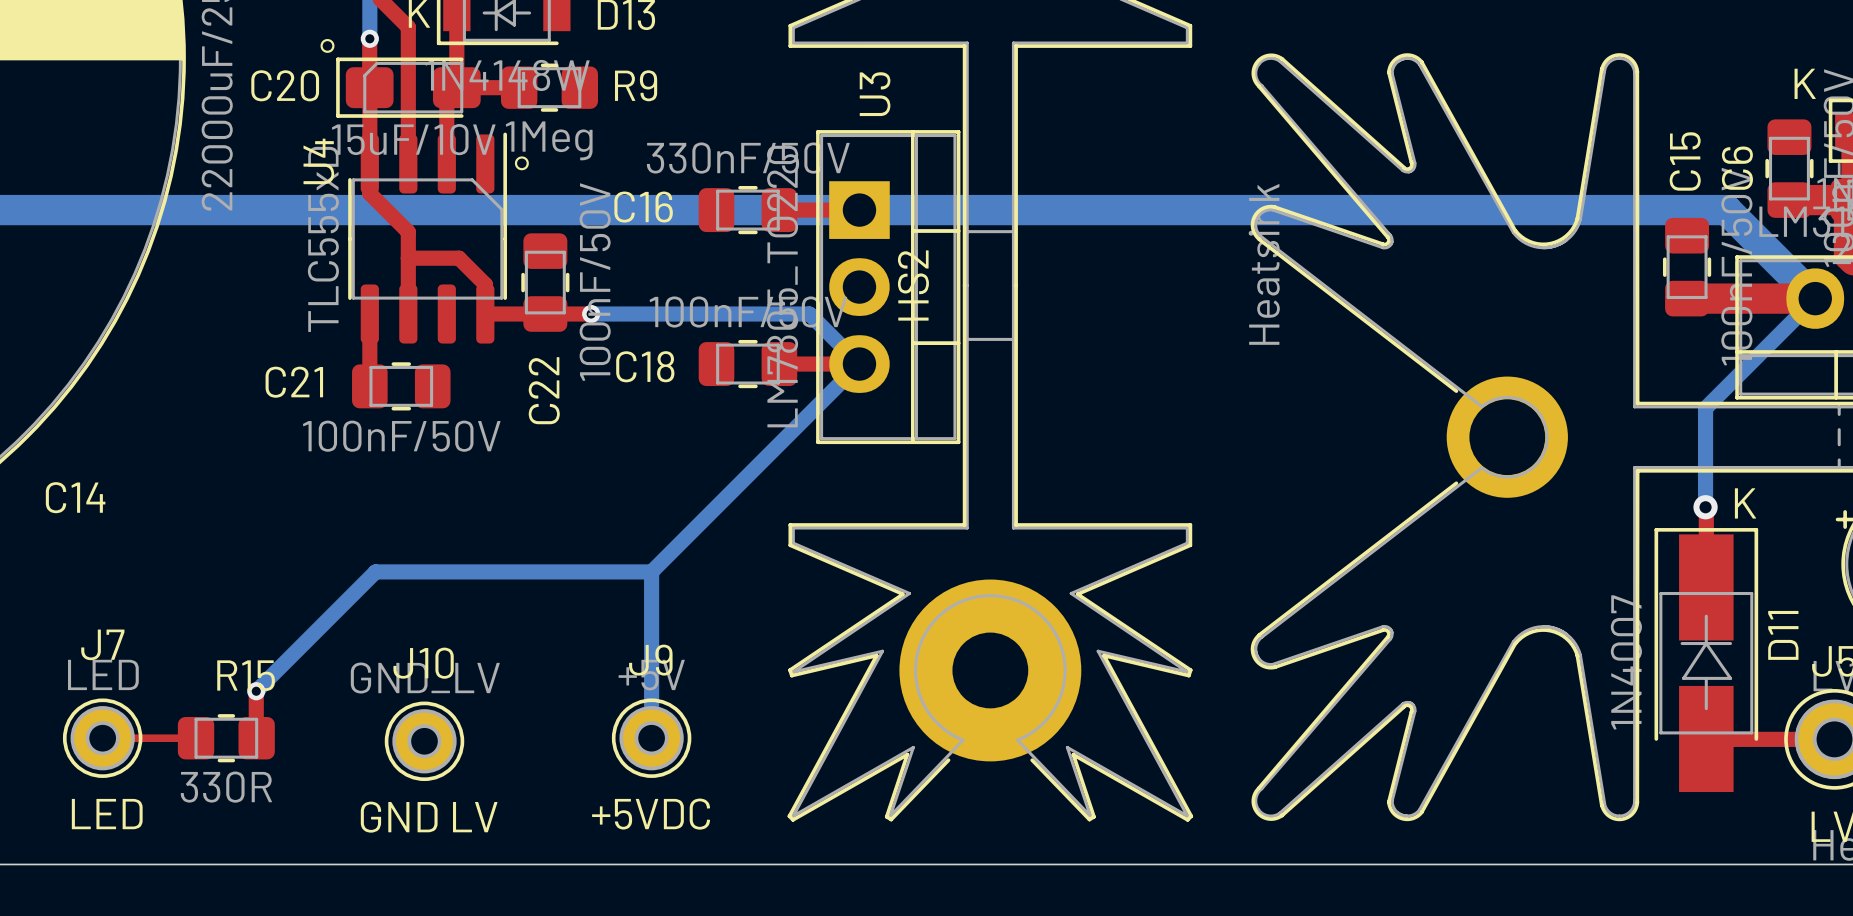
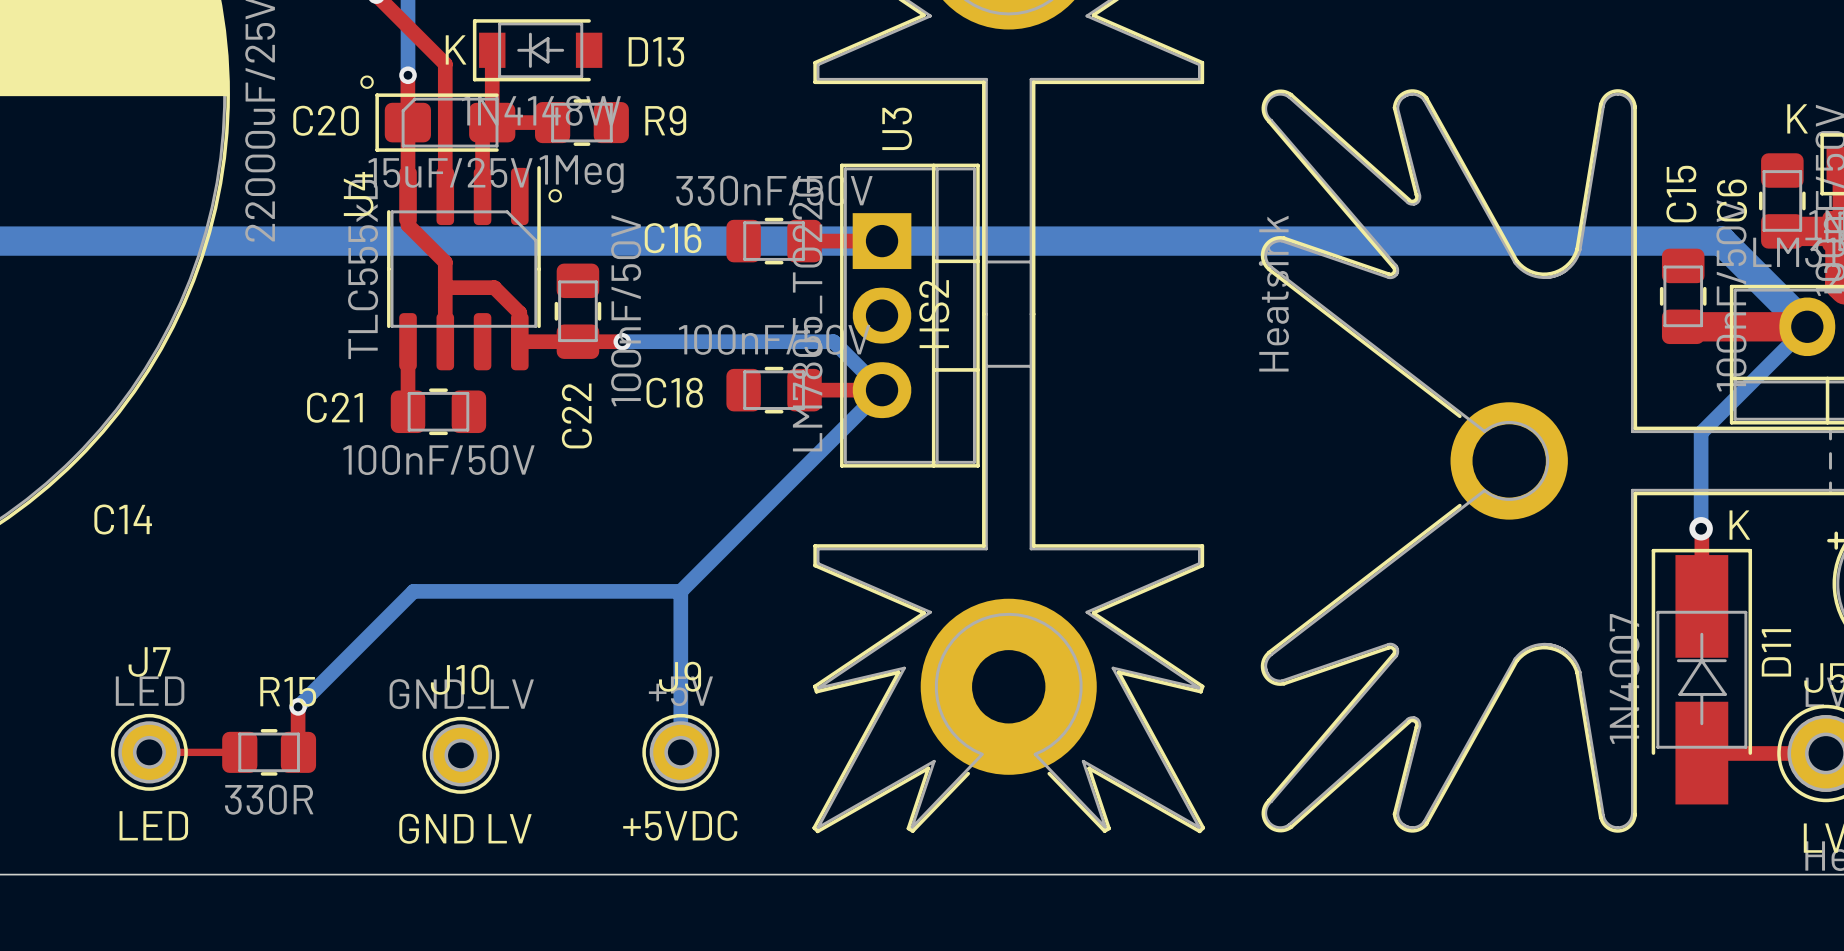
C20 value: 15uF/10V (413, 139) -> 15uF/25V (450, 172)

